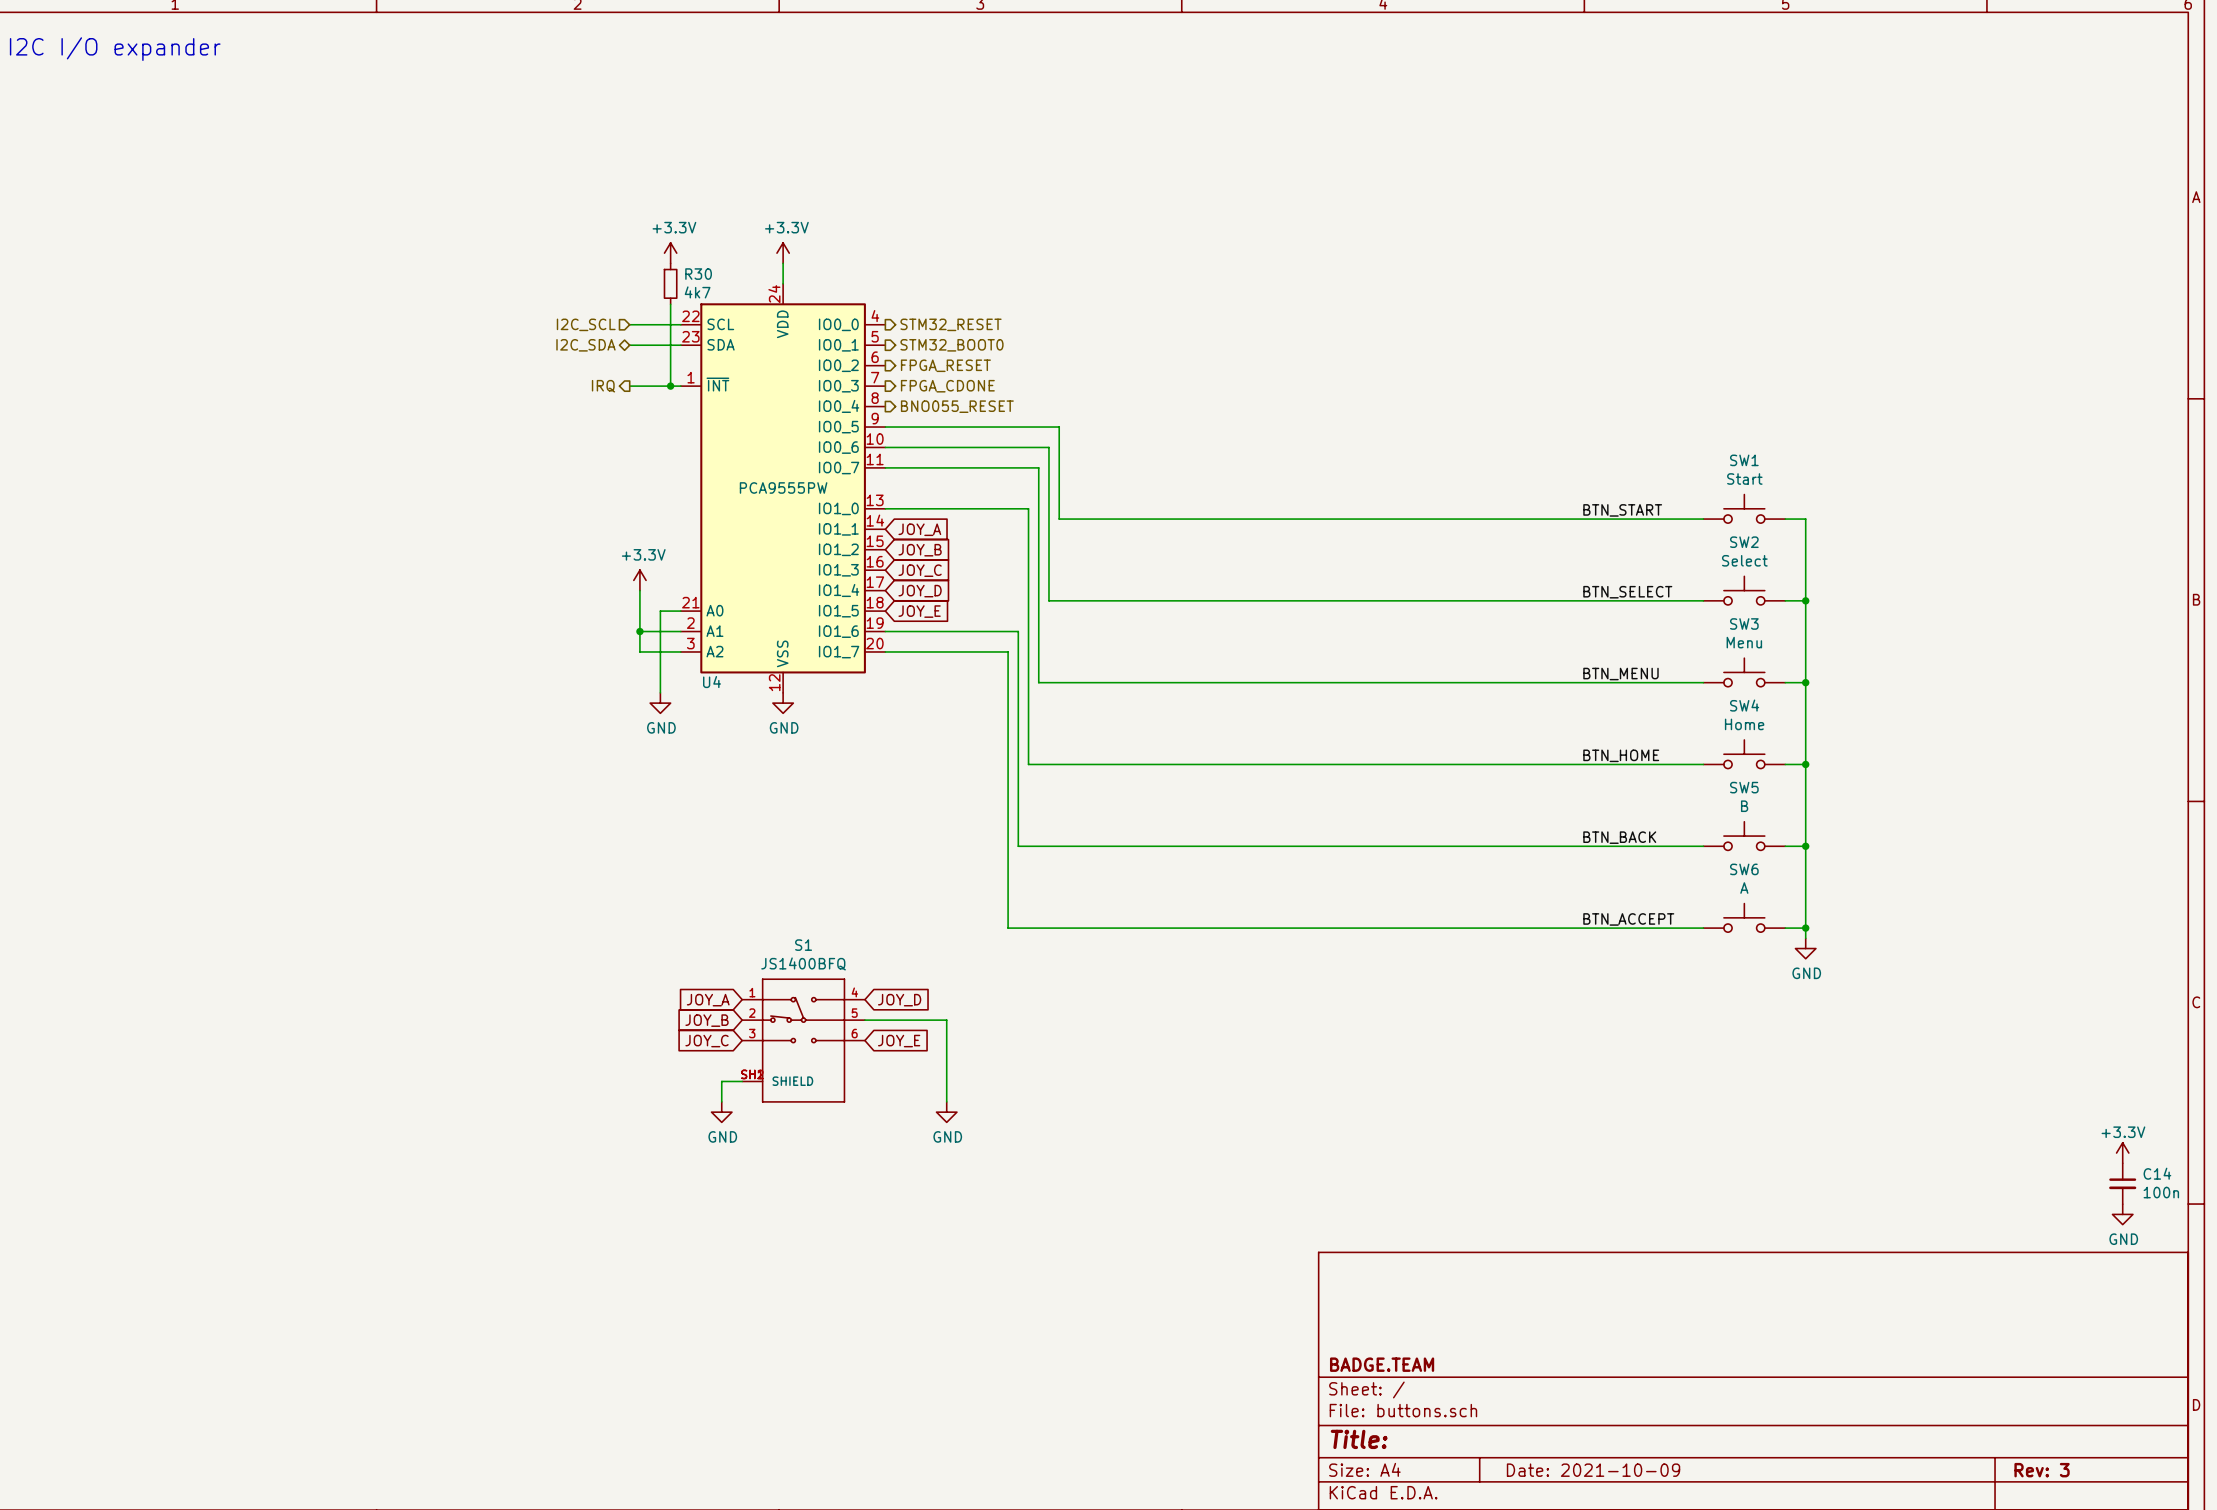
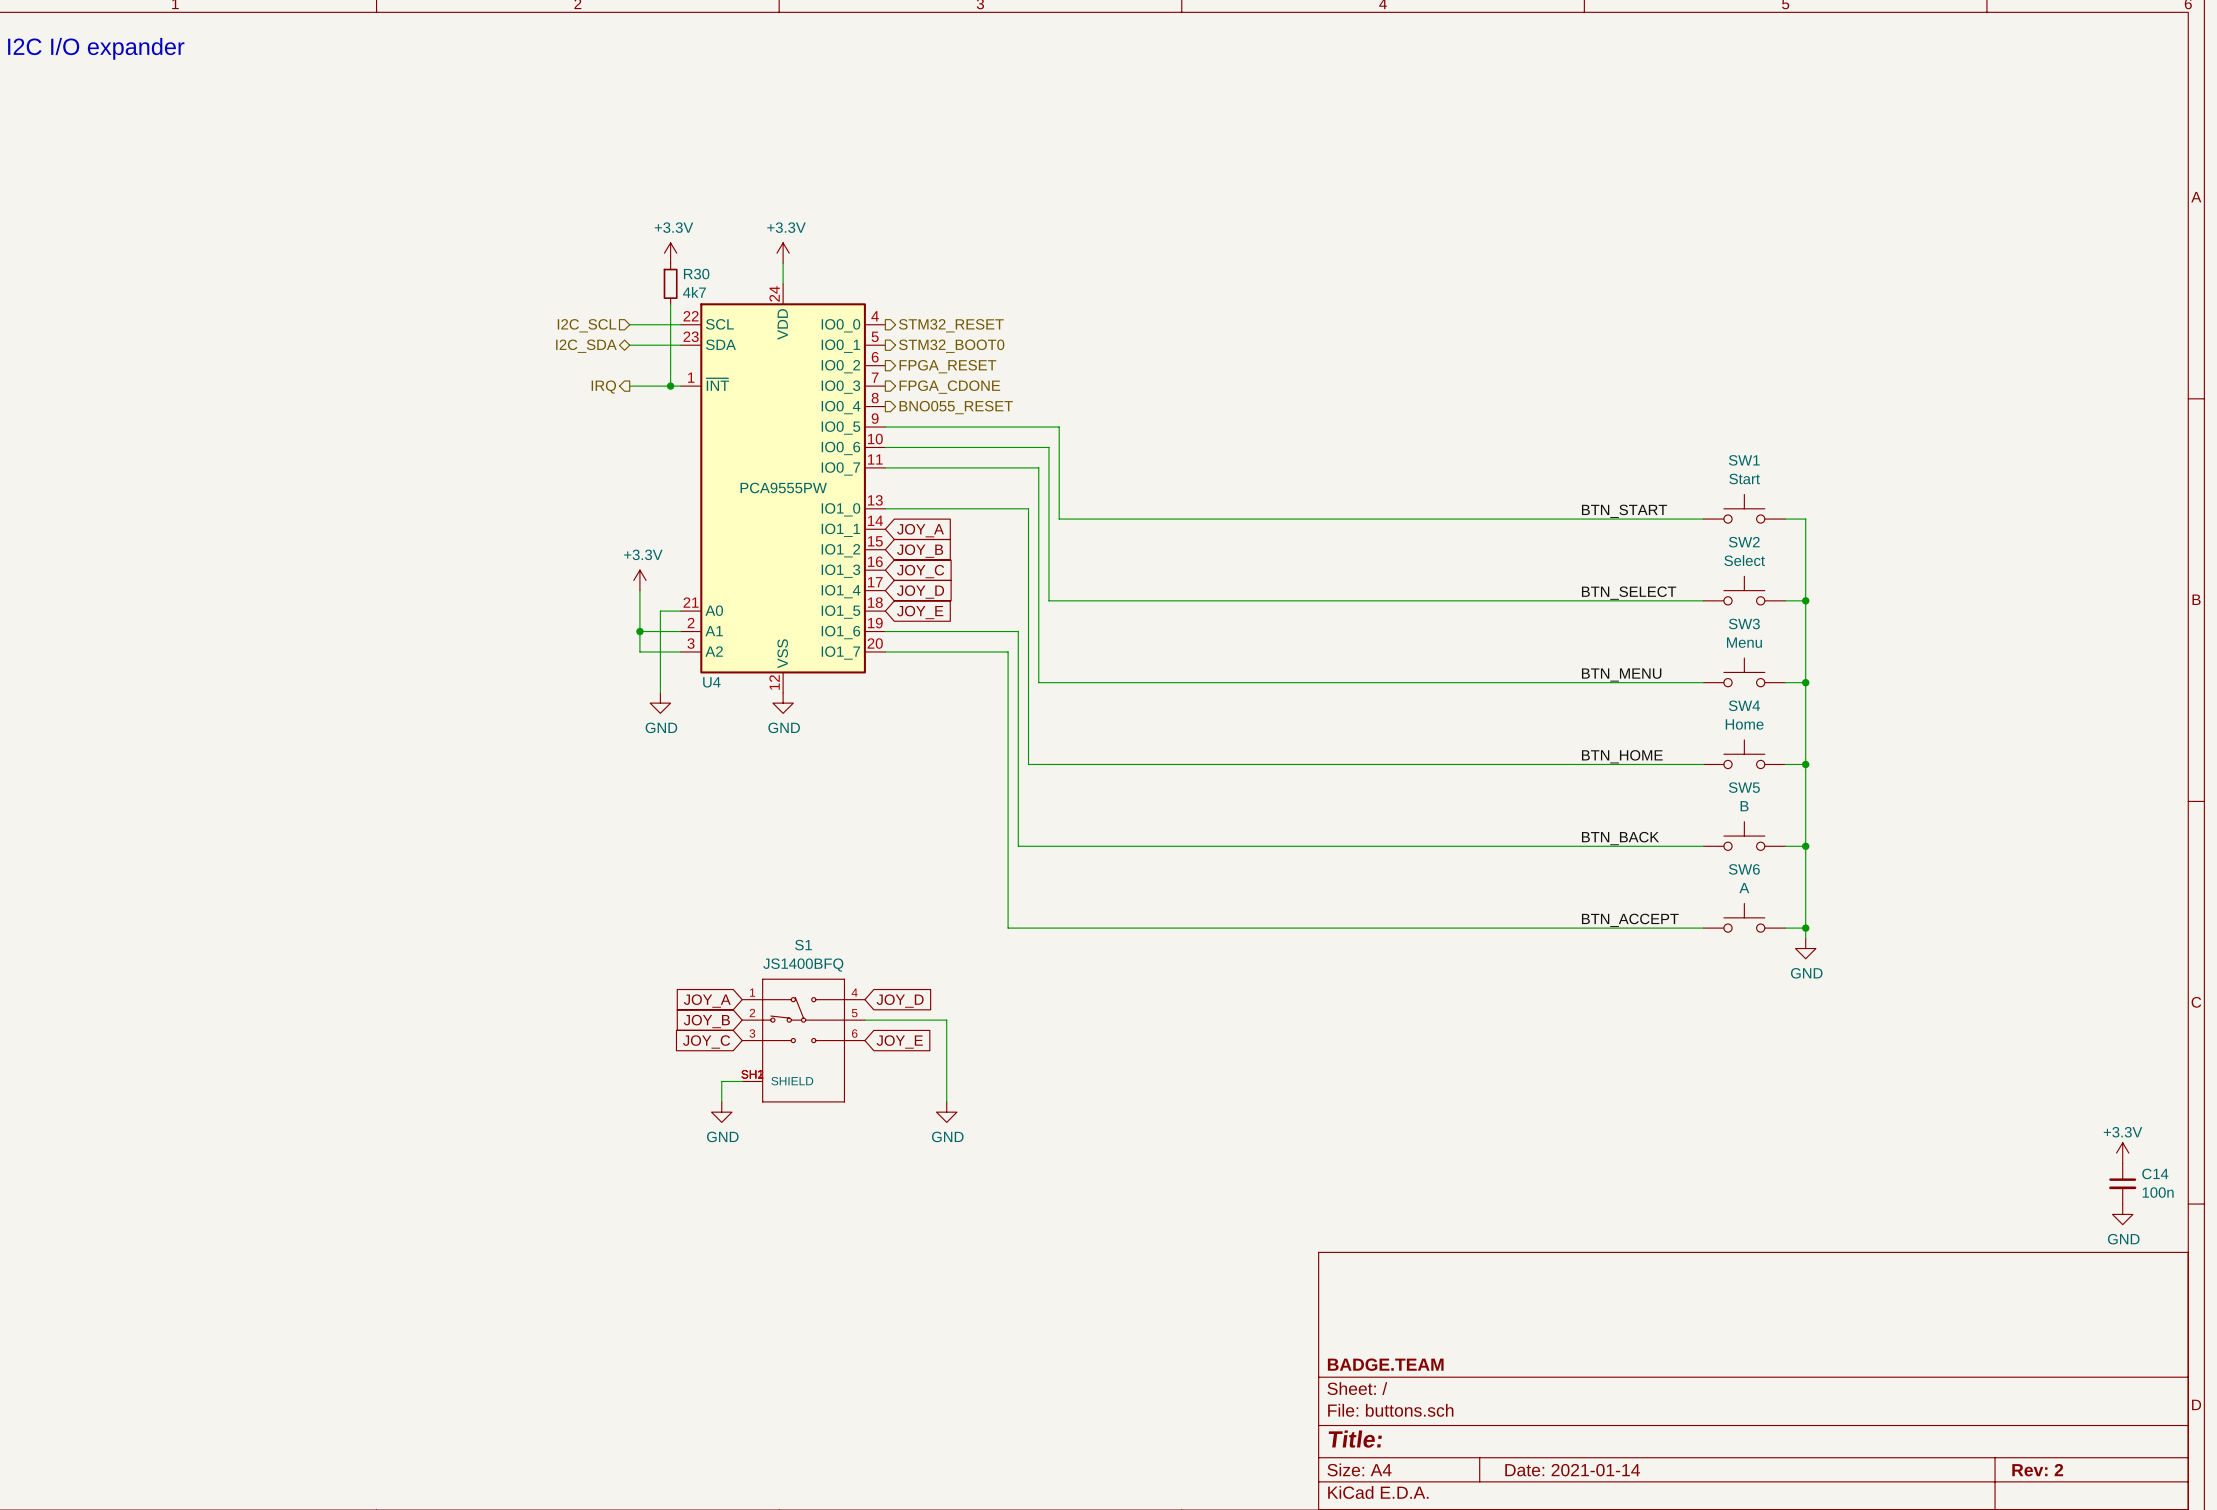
title block: Date: 2021-10-09 (1593, 1470) -> Date: 2021-01-14 (1572, 1470)
title block: Rev: 3 (2042, 1470) -> Rev: 2 (2037, 1470)

